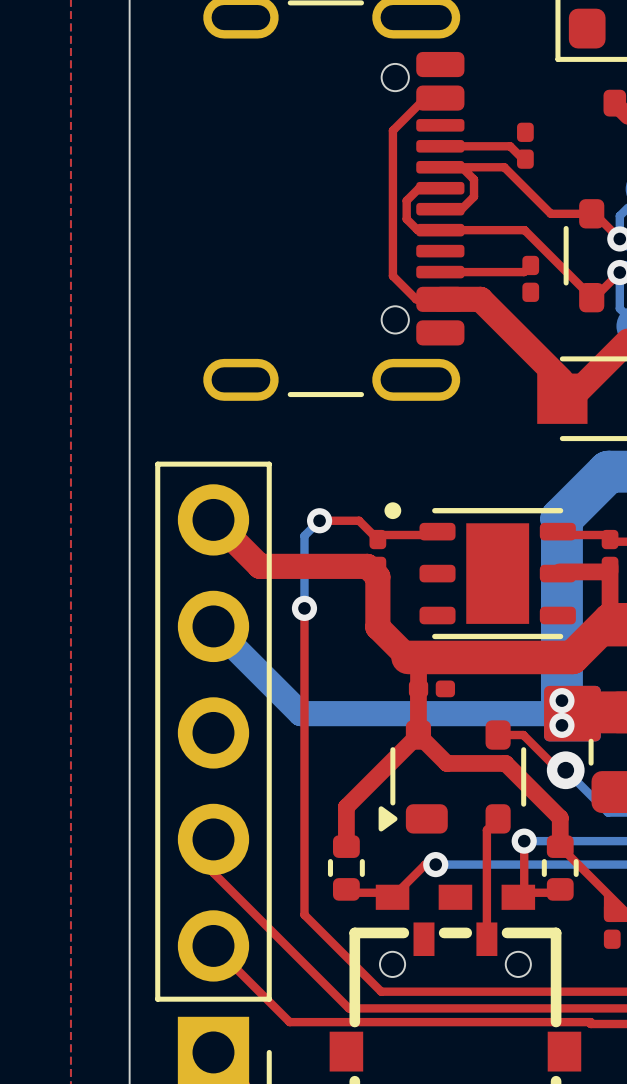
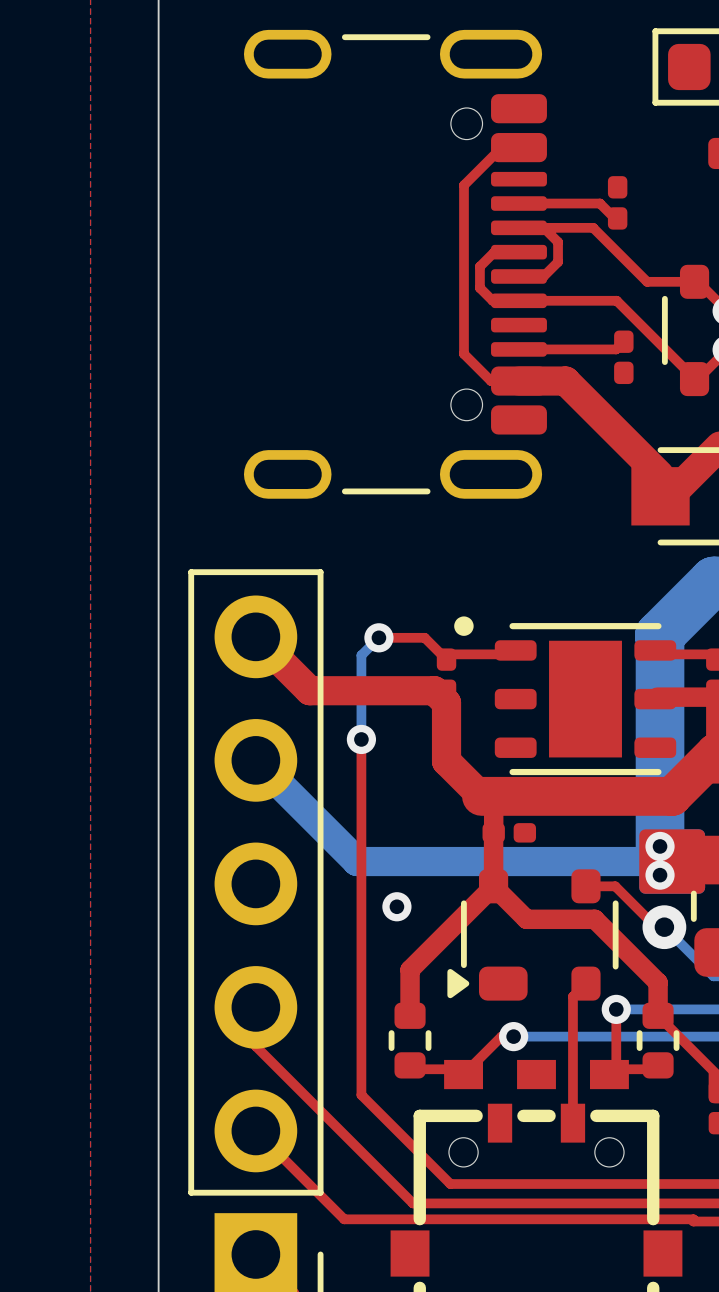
via: none -> (396, 906)

